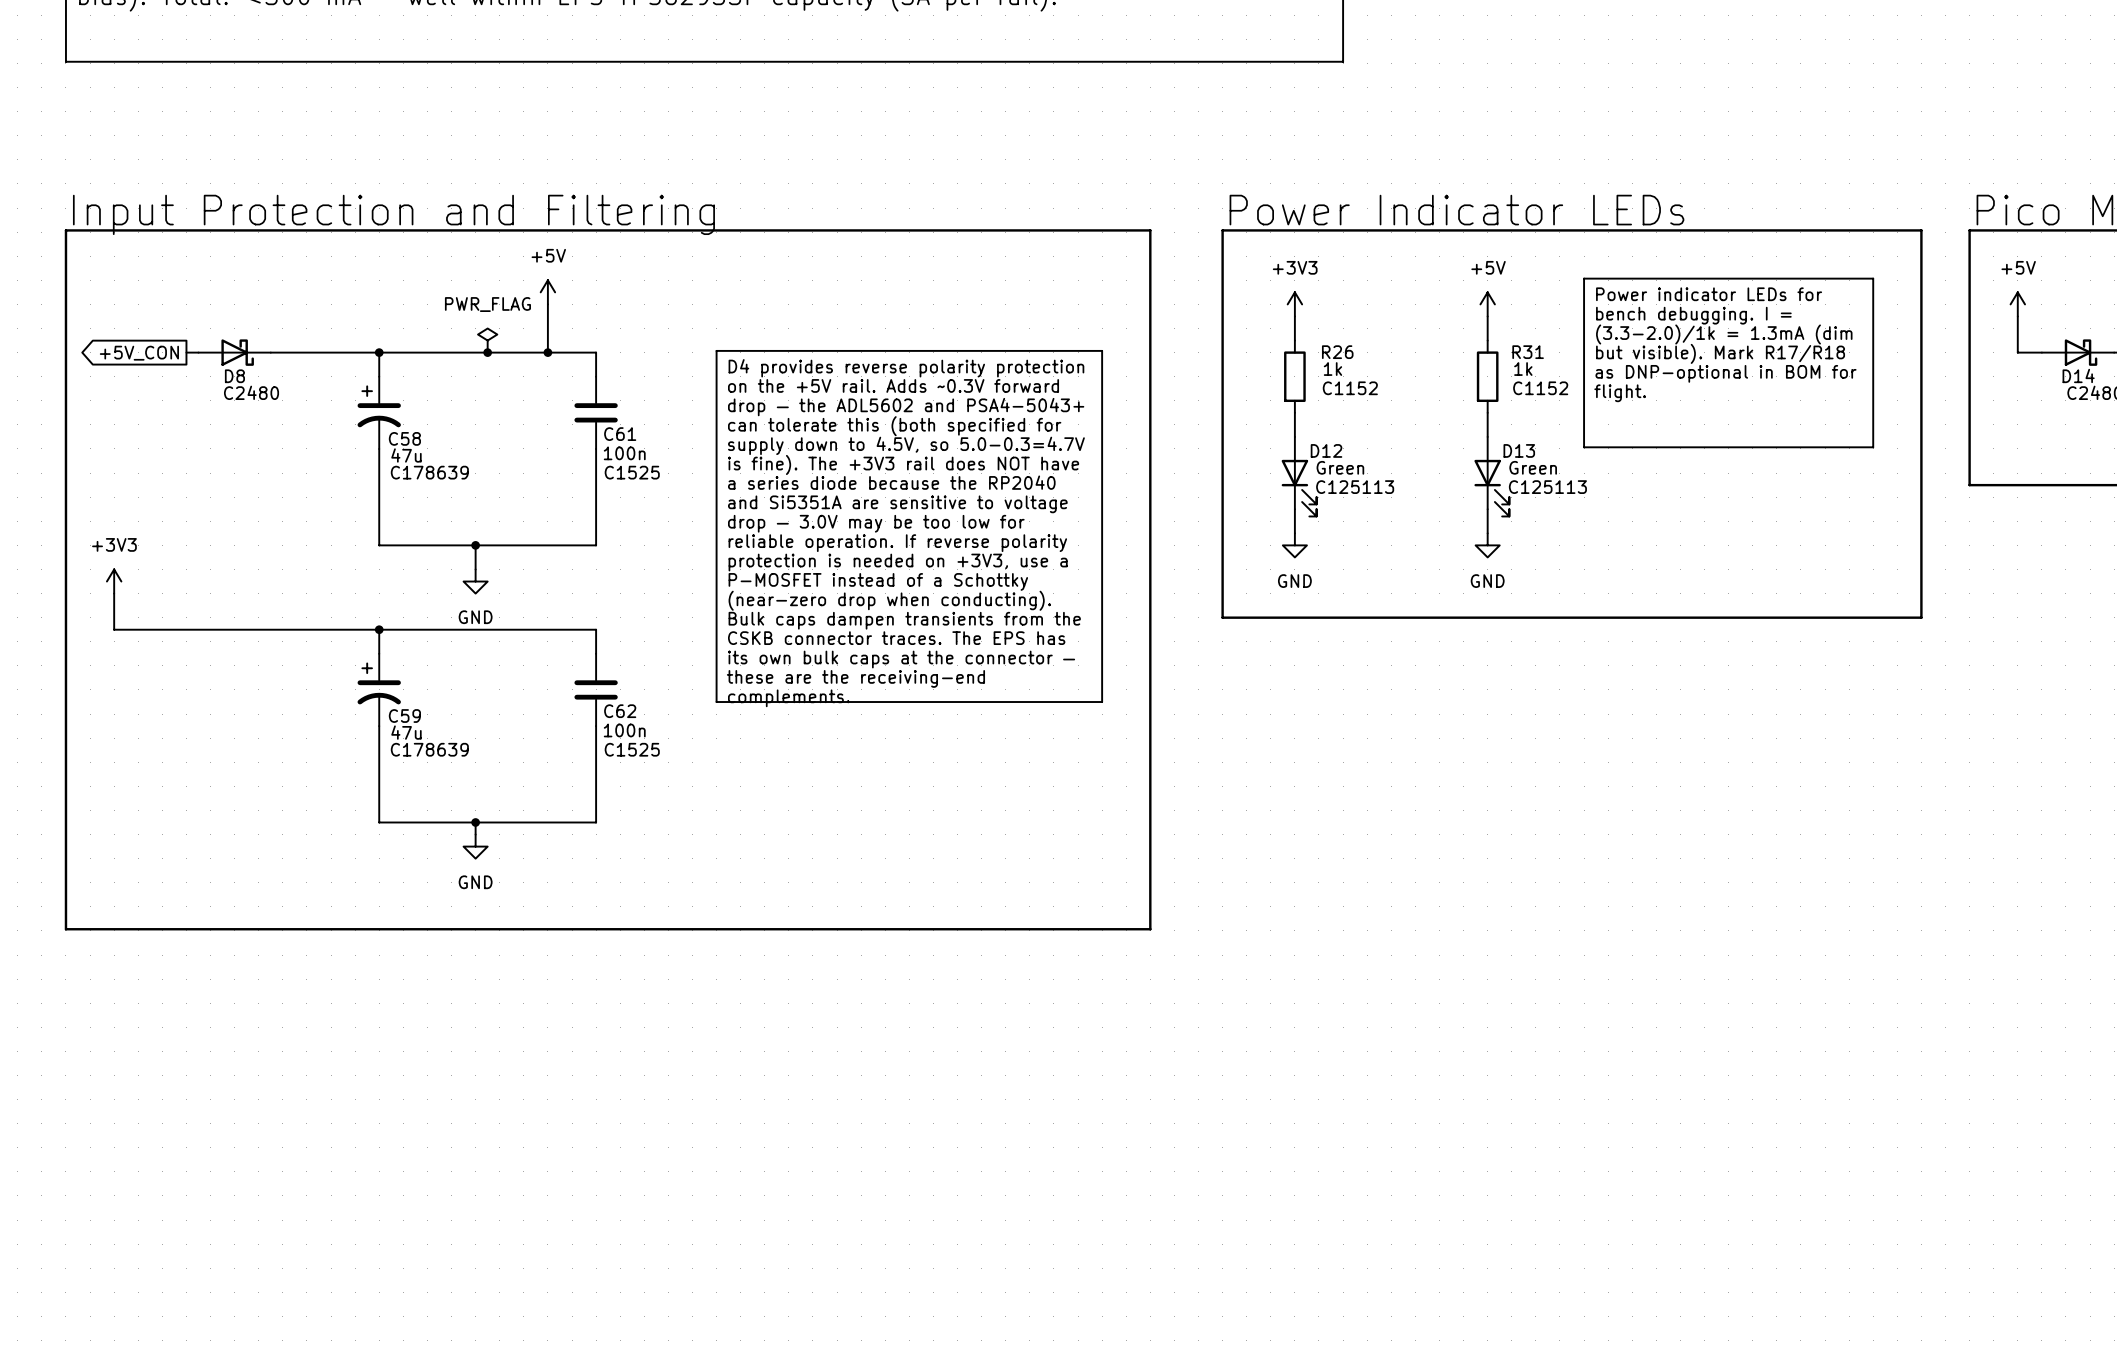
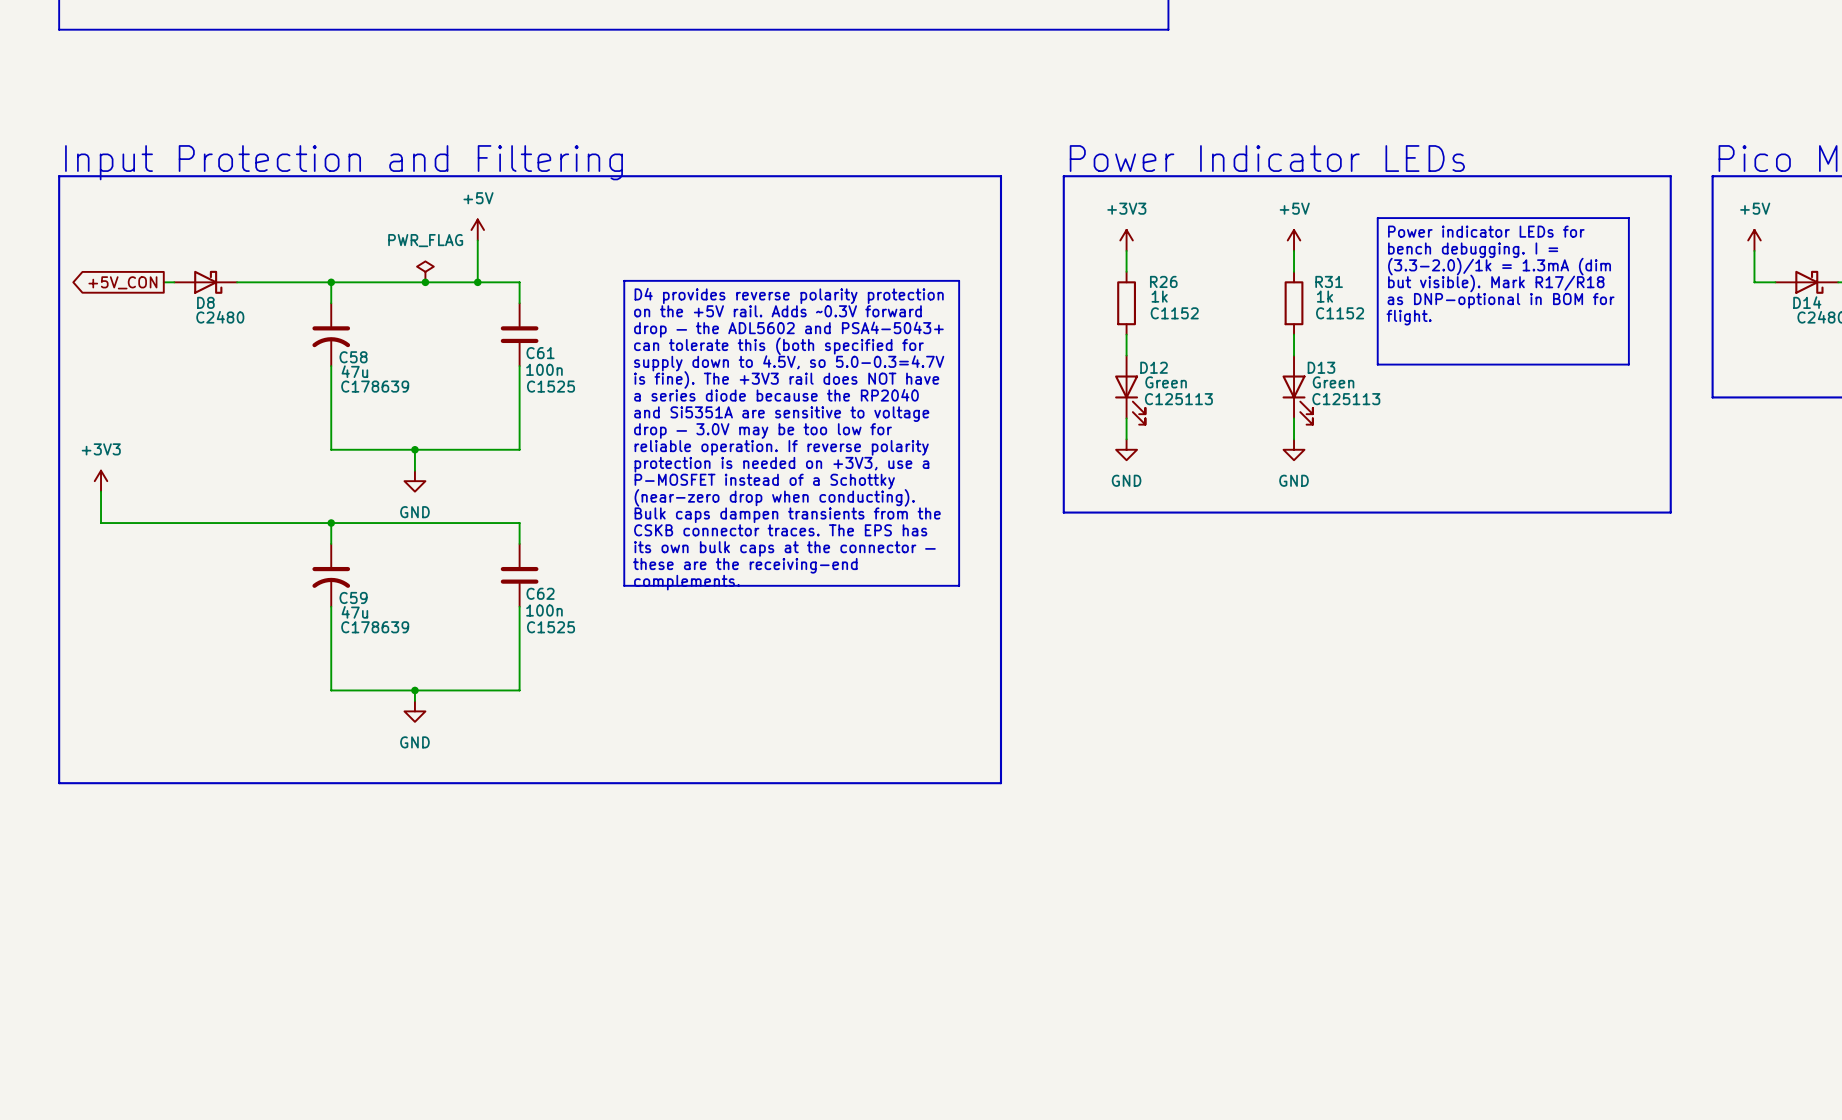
C58 symbol: [357, 376, 401, 449] -> [312, 303, 351, 367]
C59 symbol: [357, 653, 401, 727] -> [312, 543, 351, 607]

